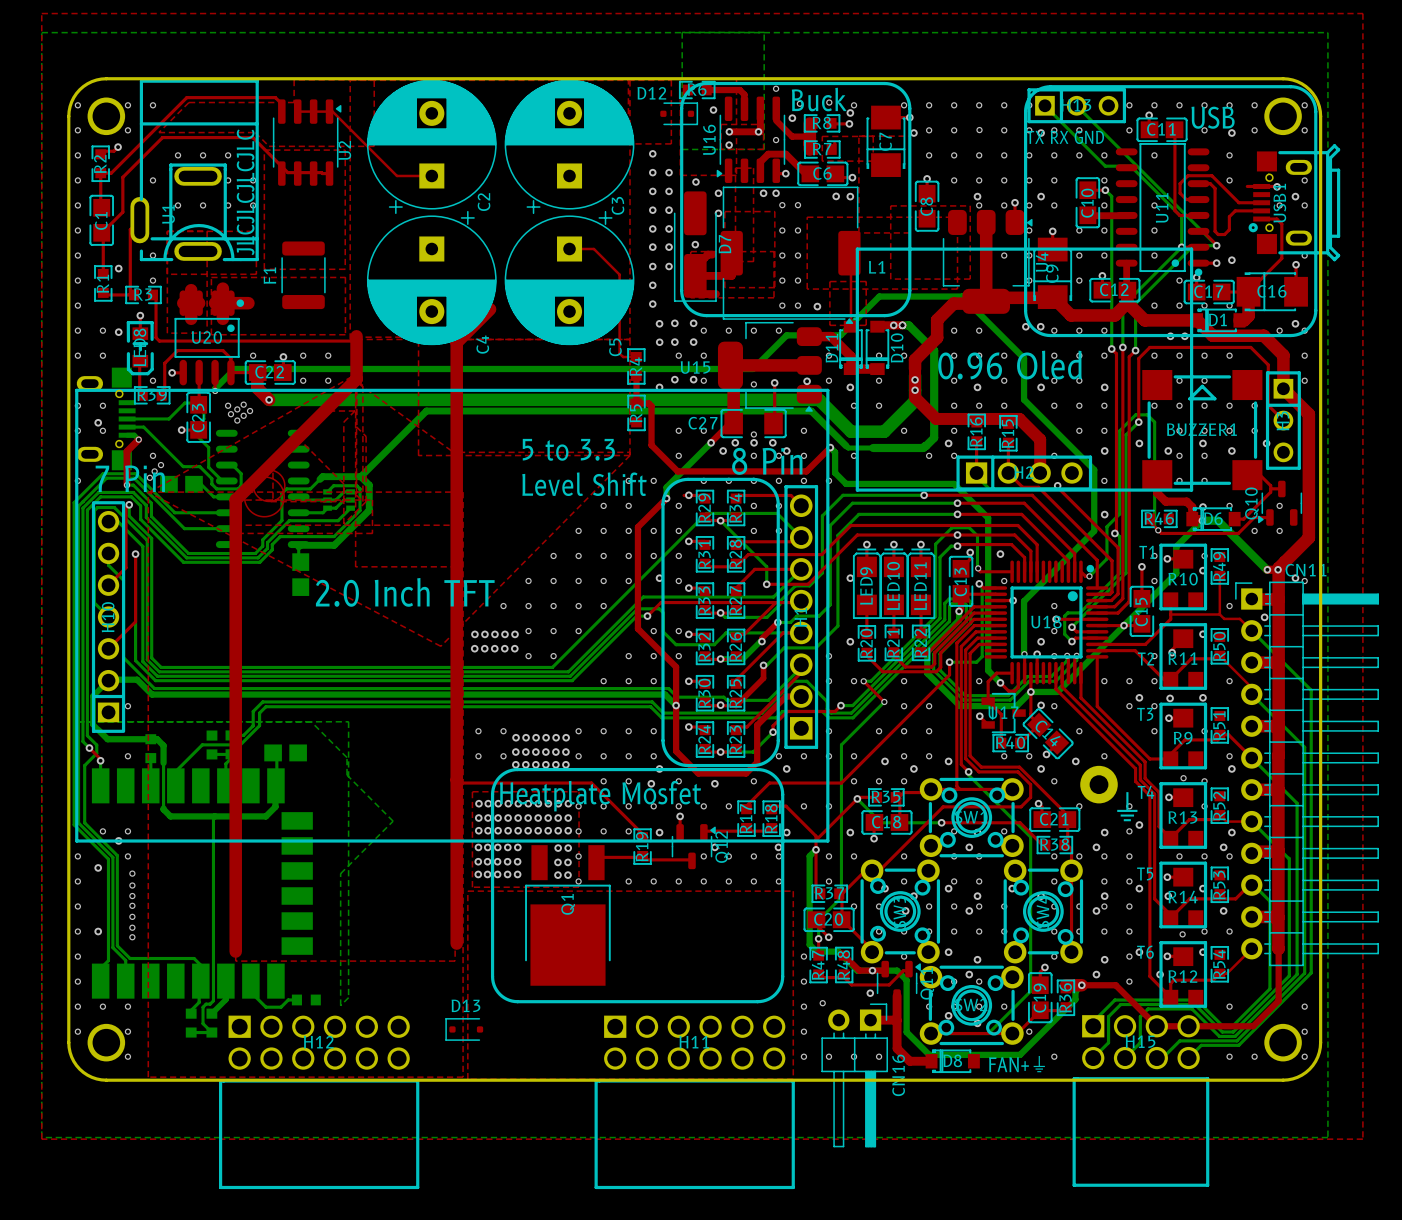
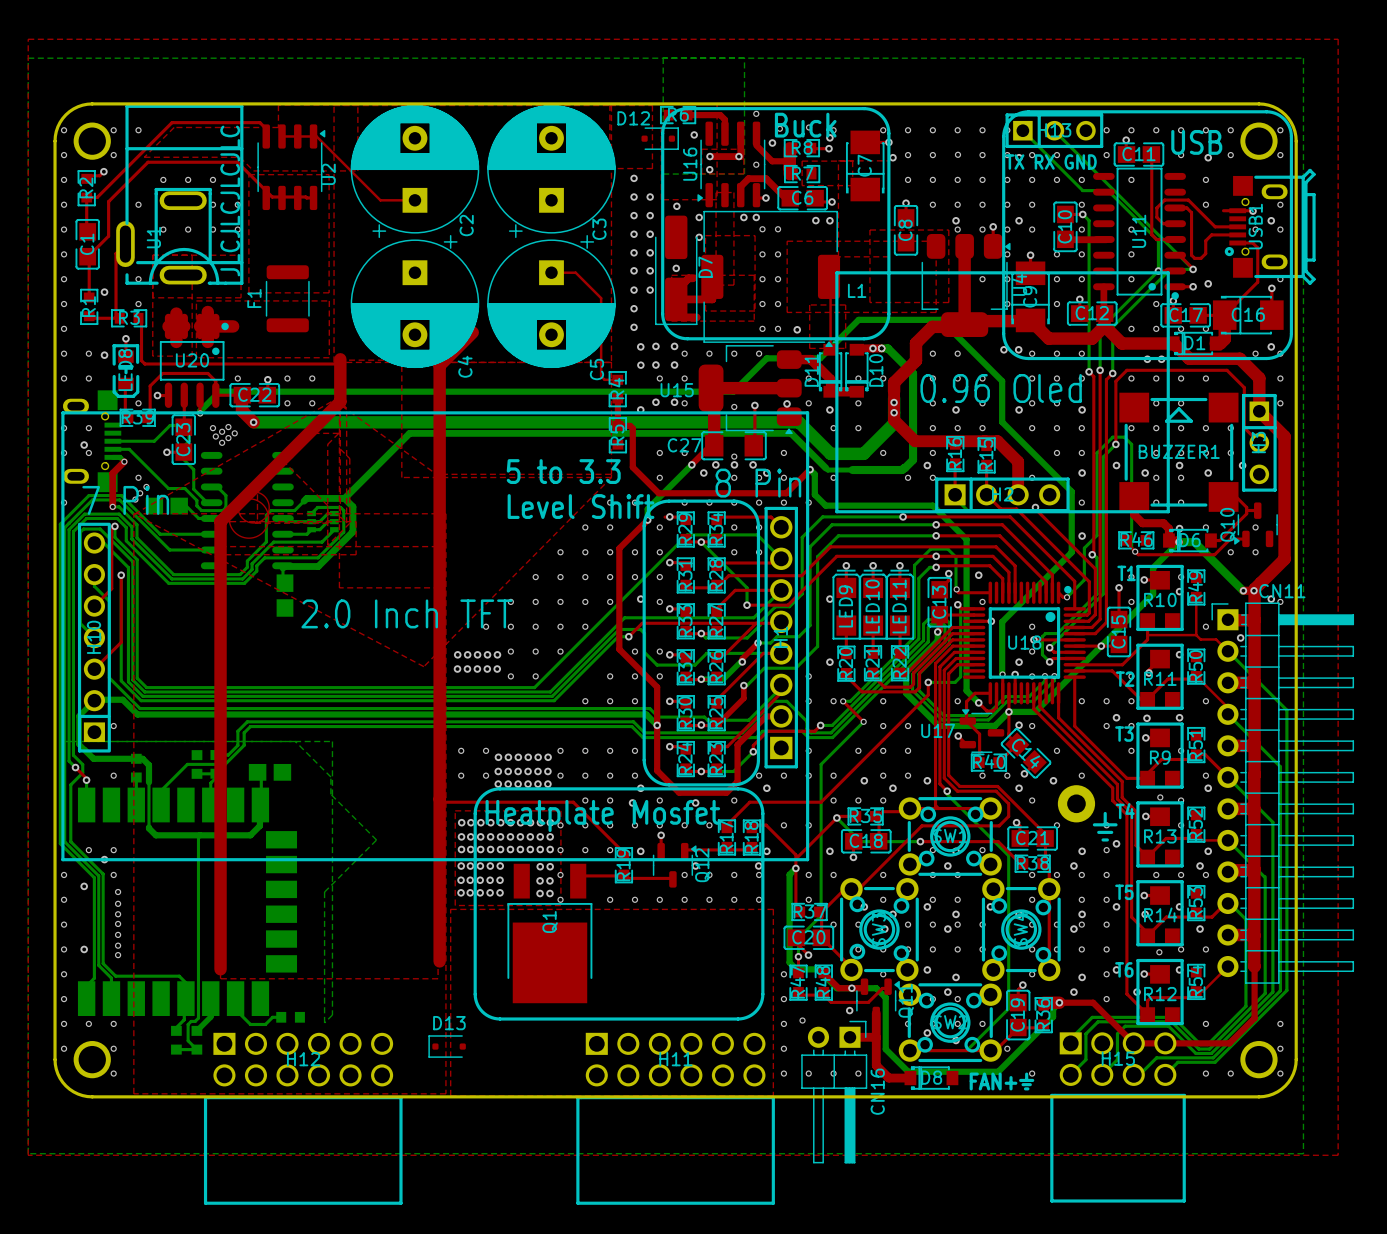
U17 footprint: [981, 692, 1026, 734] -> [959, 709, 1005, 753]
U17 name position: U17 (1003, 712) -> U17 (938, 730)

